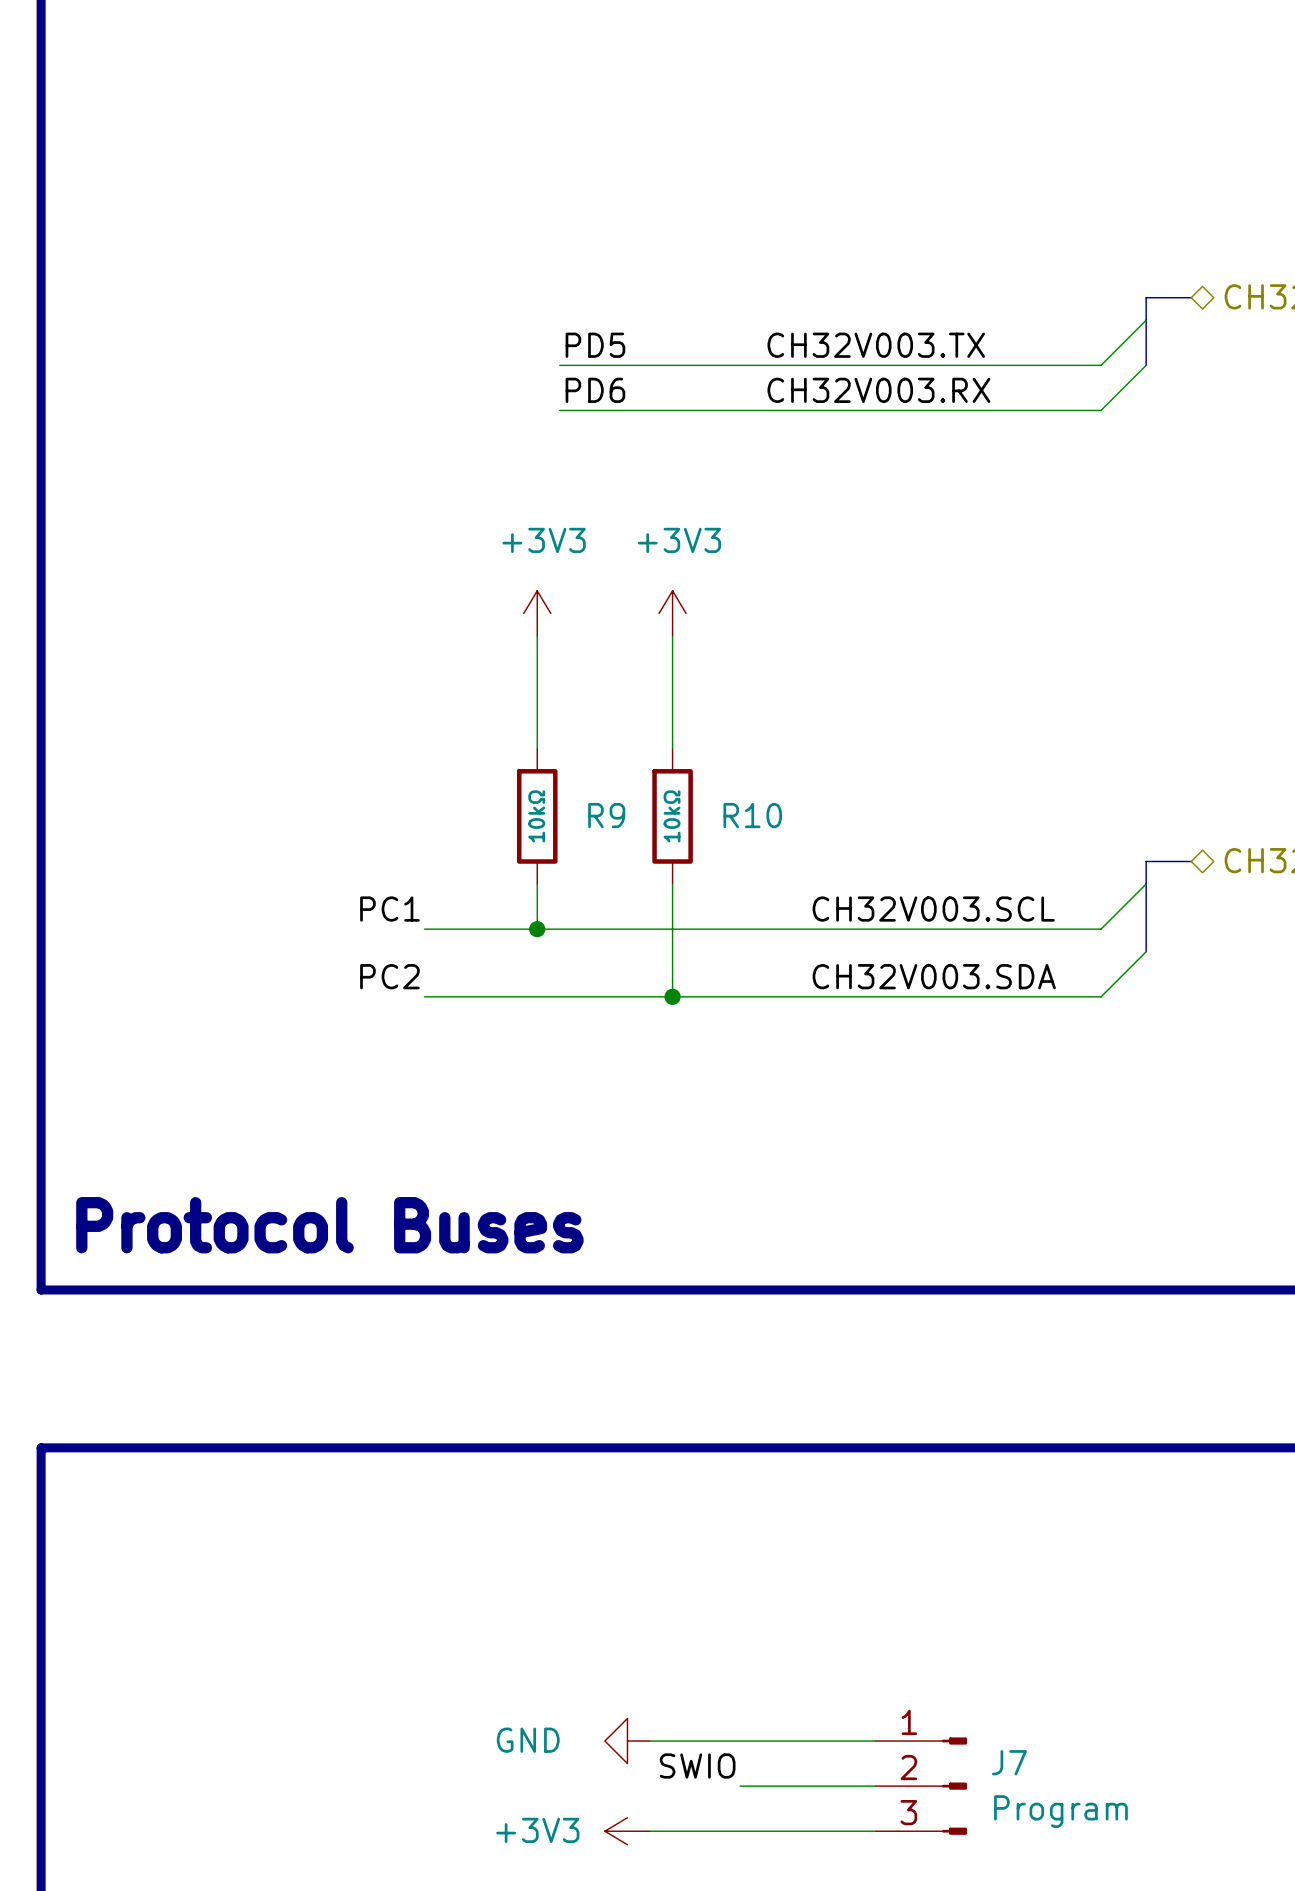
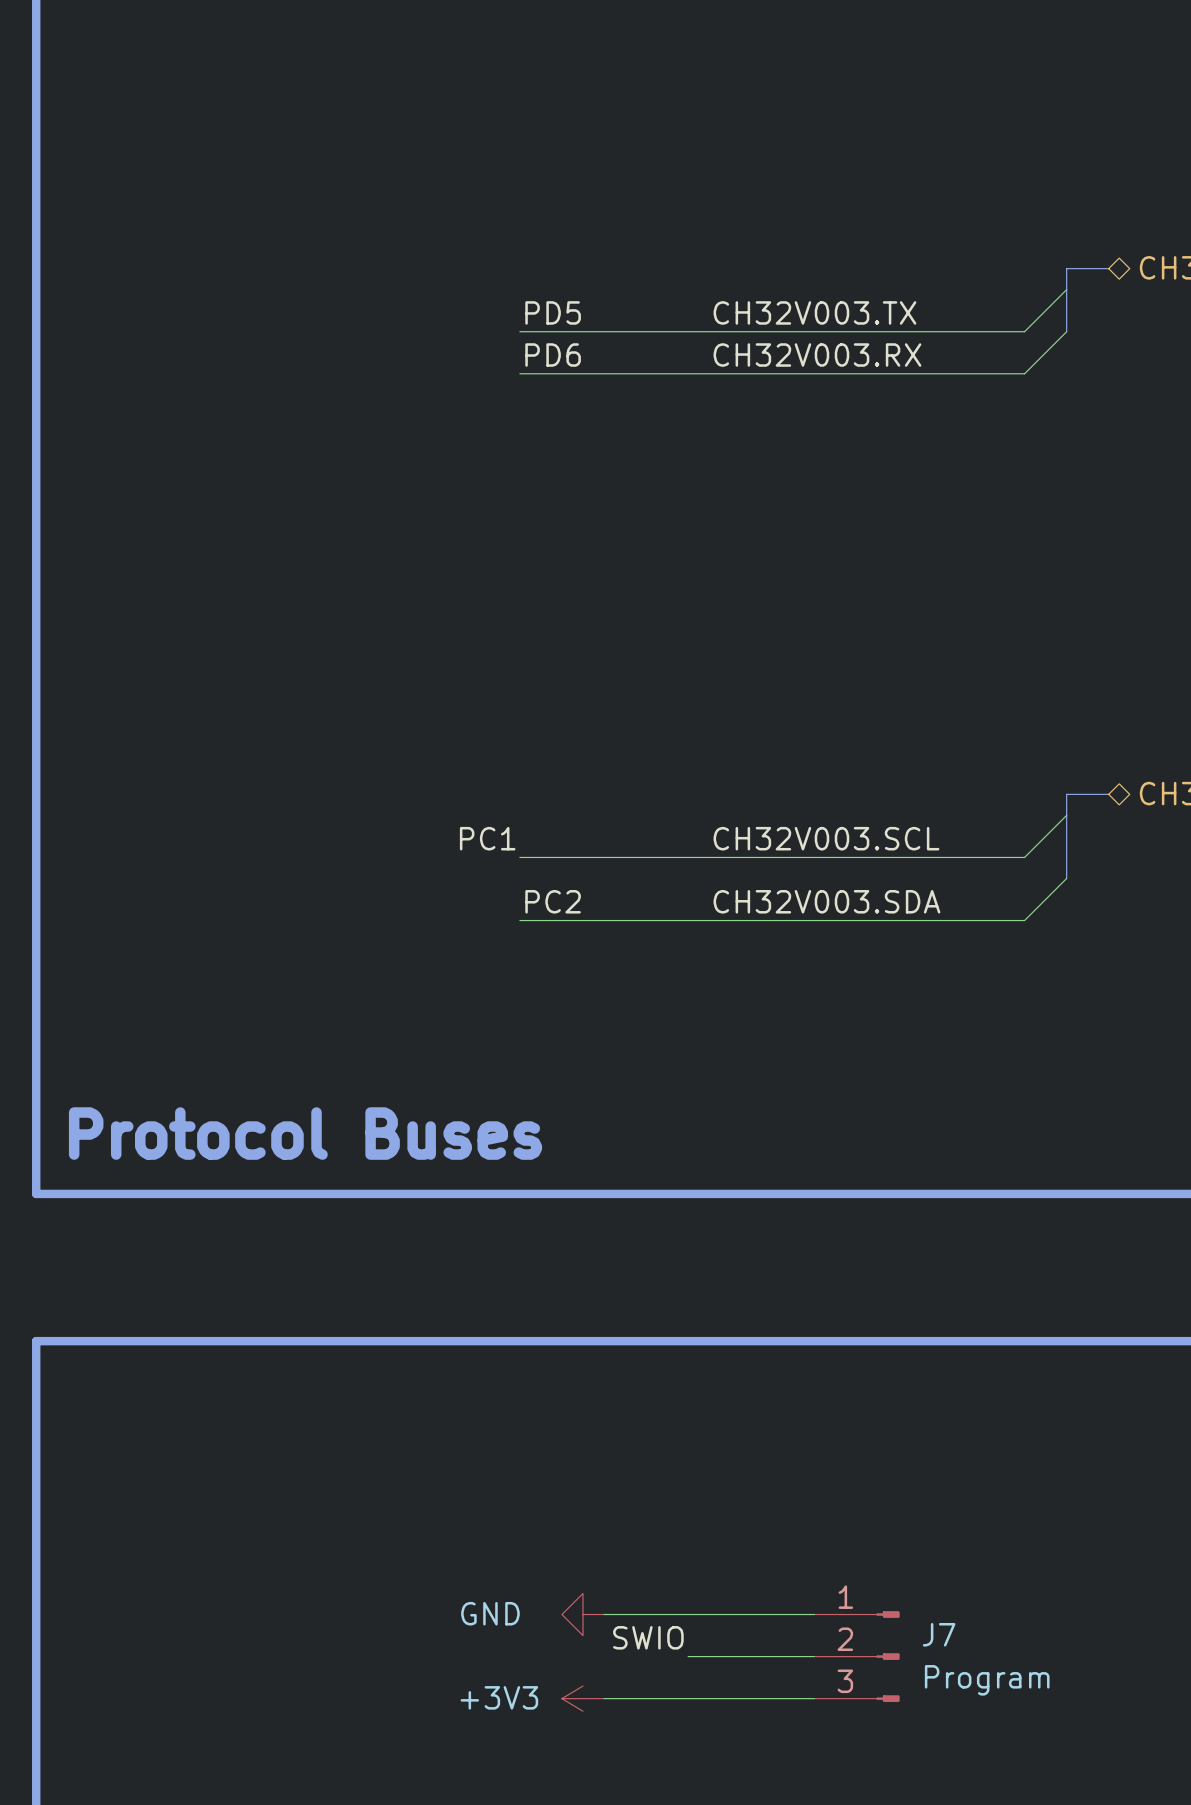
power symbol: +3V3 (537, 613) -> none
power symbol: +3V3 (672, 613) -> none
wire: (537, 635) (537, 748) -> none
wire: (672, 635) (672, 748) -> none
R9: 10kΩ (537, 816) -> none
R10: 10kΩ (672, 816) -> none
wire: (537, 884) (537, 929) -> none
wire: (672, 884) (672, 996) -> none
label position: PC1 (389, 909) -> PC1 (487, 838)
label position: CH32V003.SCL (933, 909) -> CH32V003.SCL (826, 838)
wire: (424, 929) (559, 929) -> none
junction: (537, 929) -> none
label position: PC2 (389, 976) -> PC2 (553, 901)
label position: CH32V003.SDA (934, 976) -> CH32V003.SDA (826, 901)
wire: (424, 996) (559, 996) -> none
junction: (672, 996) -> none

